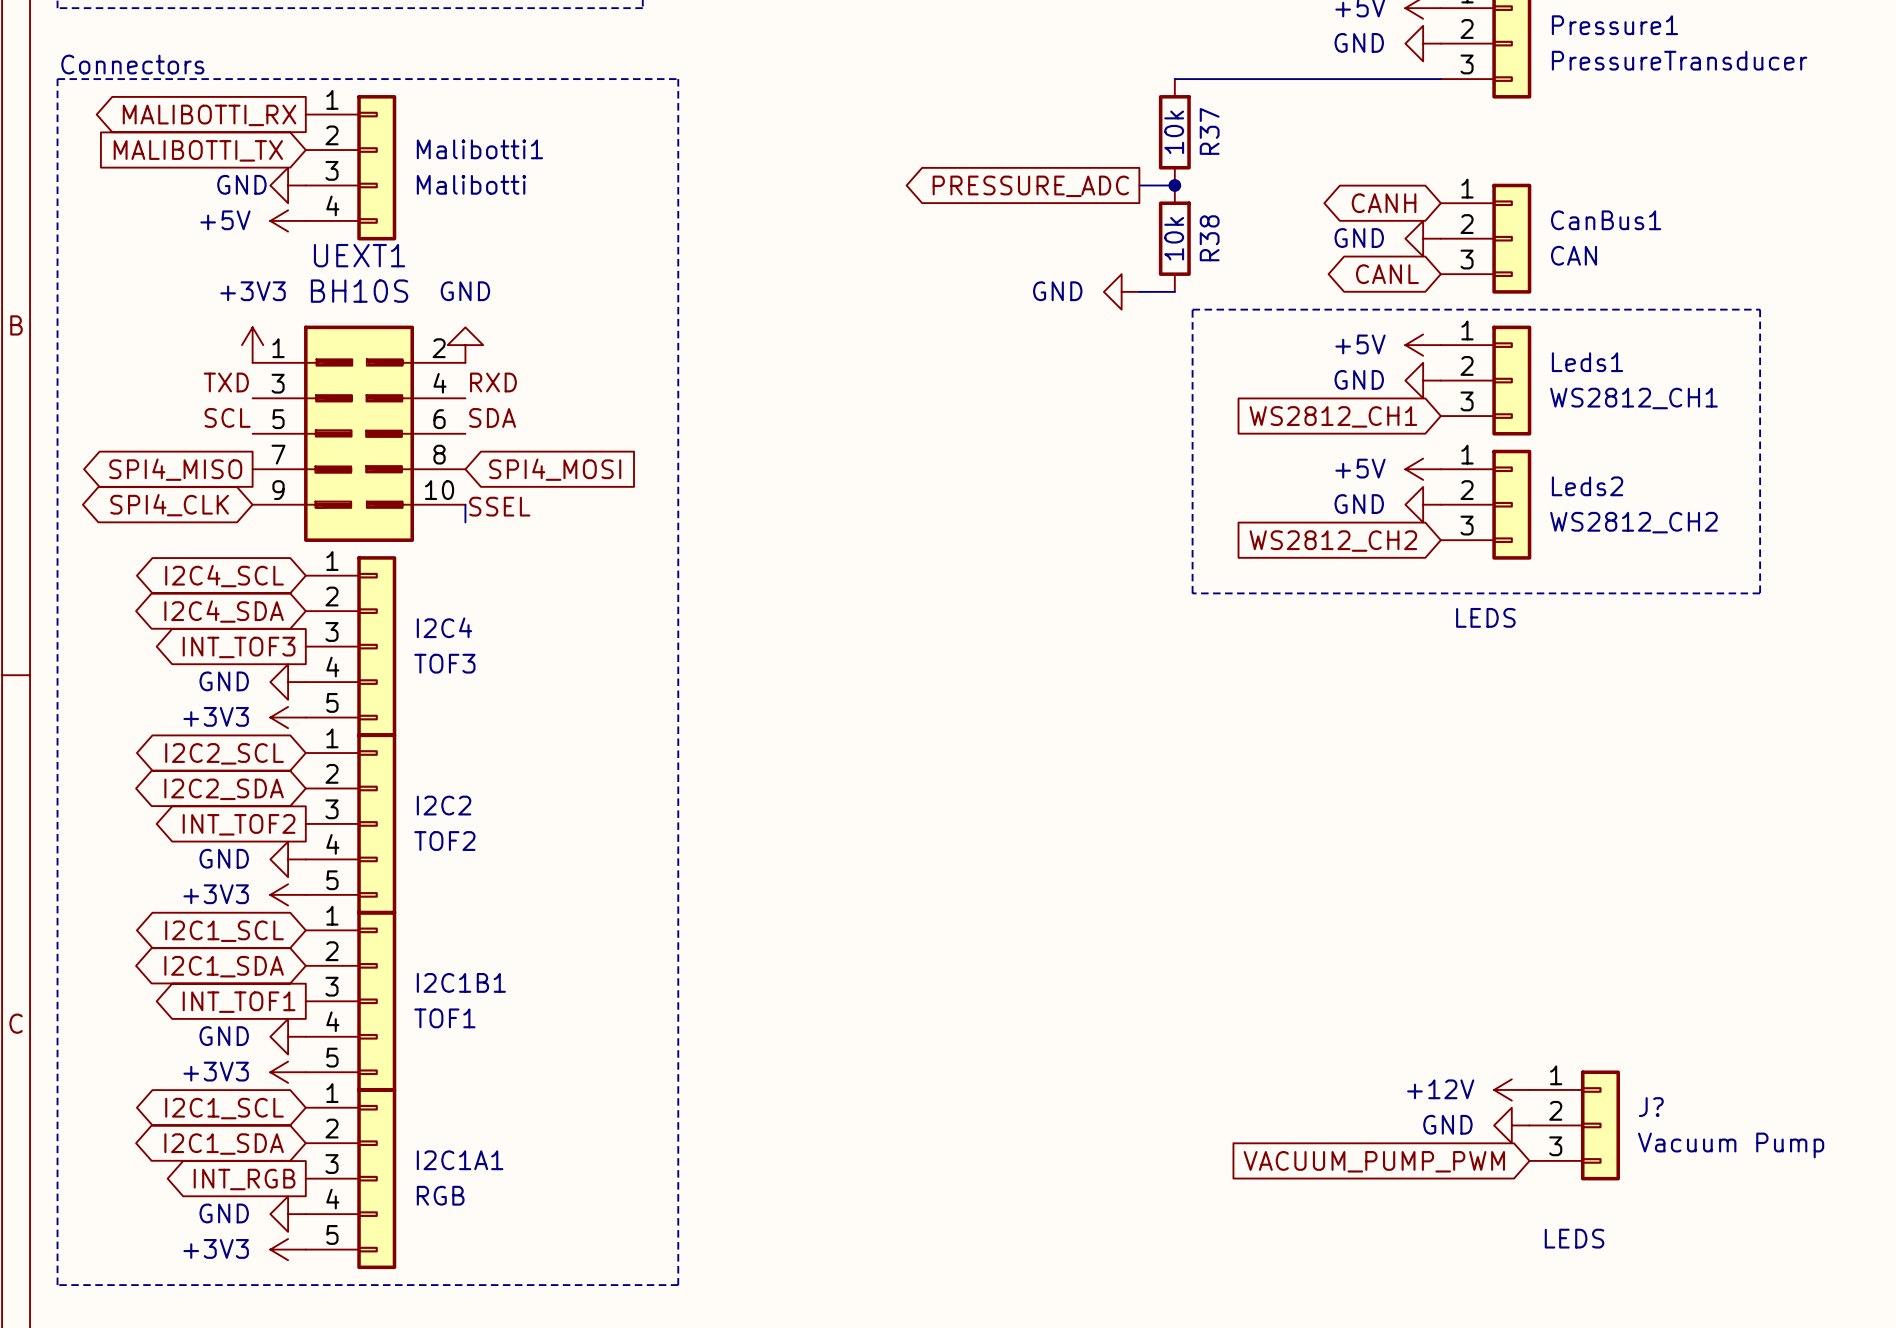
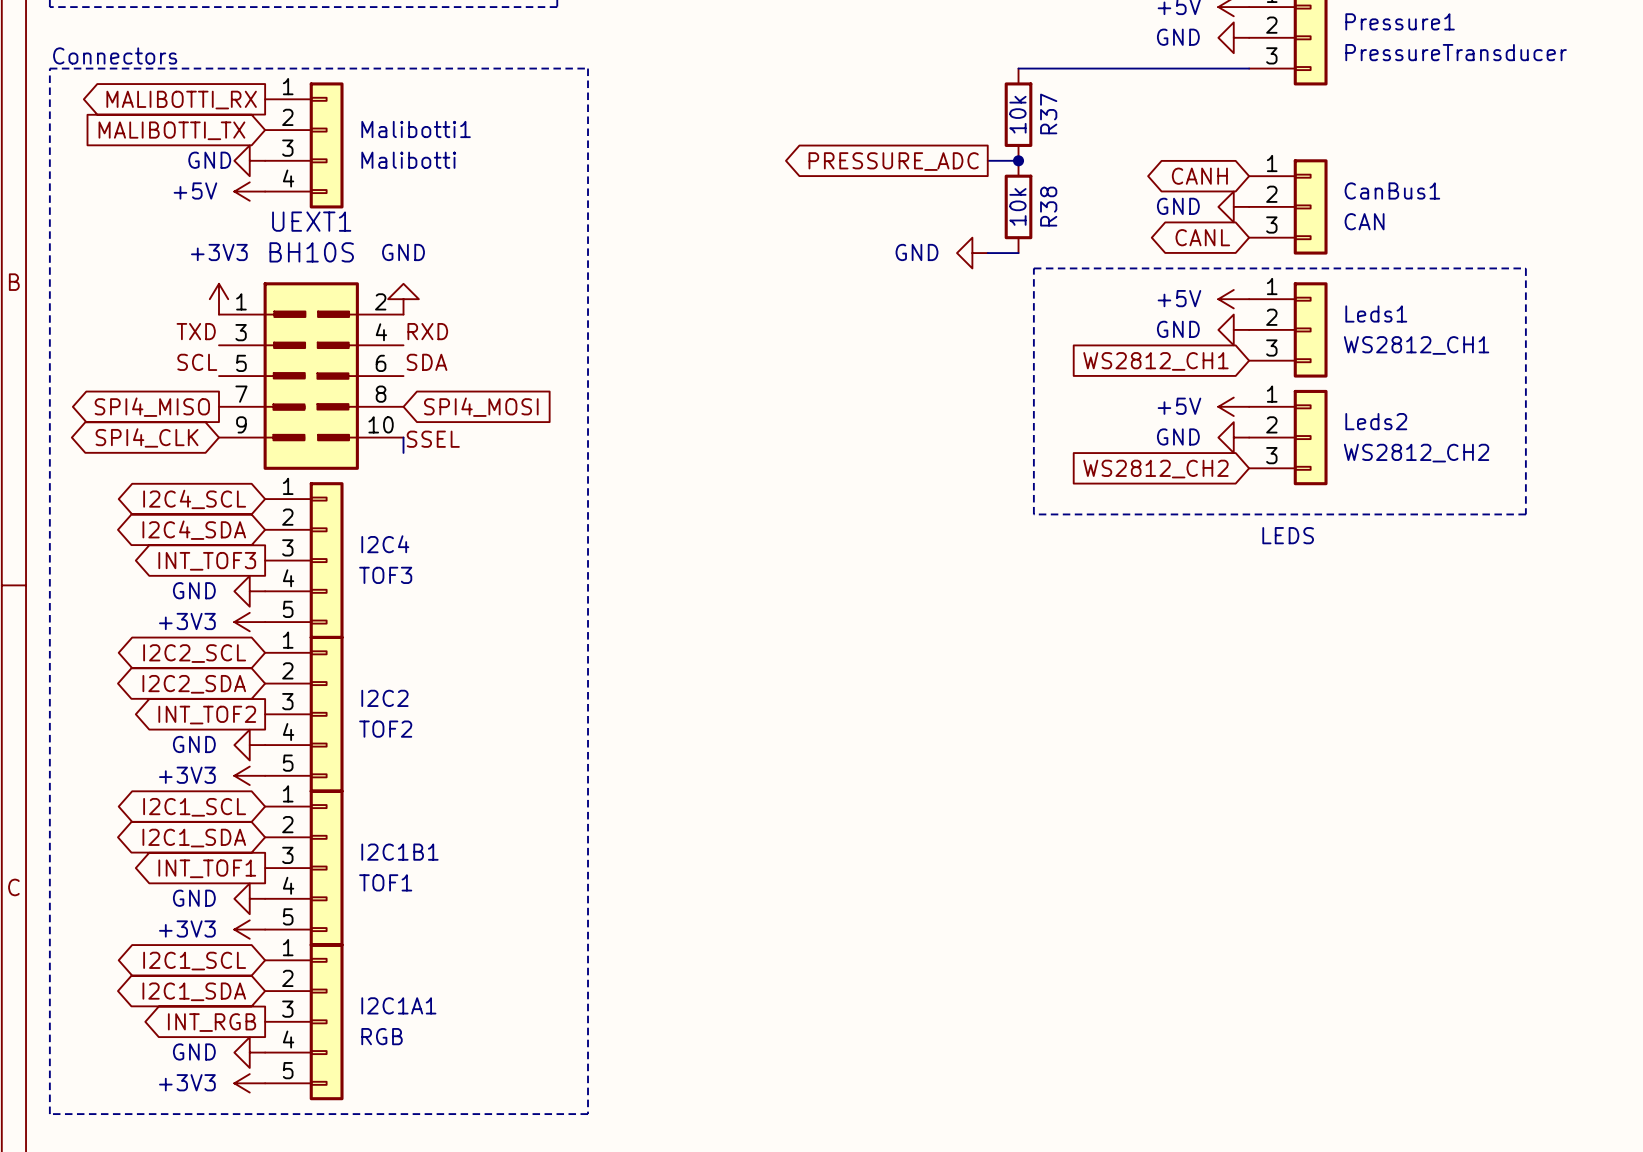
power symbol: +12V (1511, 1089) -> none
power symbol: GND (1511, 1125) -> none
J?: Vacuum Pump (1574, 1125) -> none
global label: VACUUM_PUMP_PWM (1374, 1161) -> none
text: LEDS (1574, 1238) -> none

